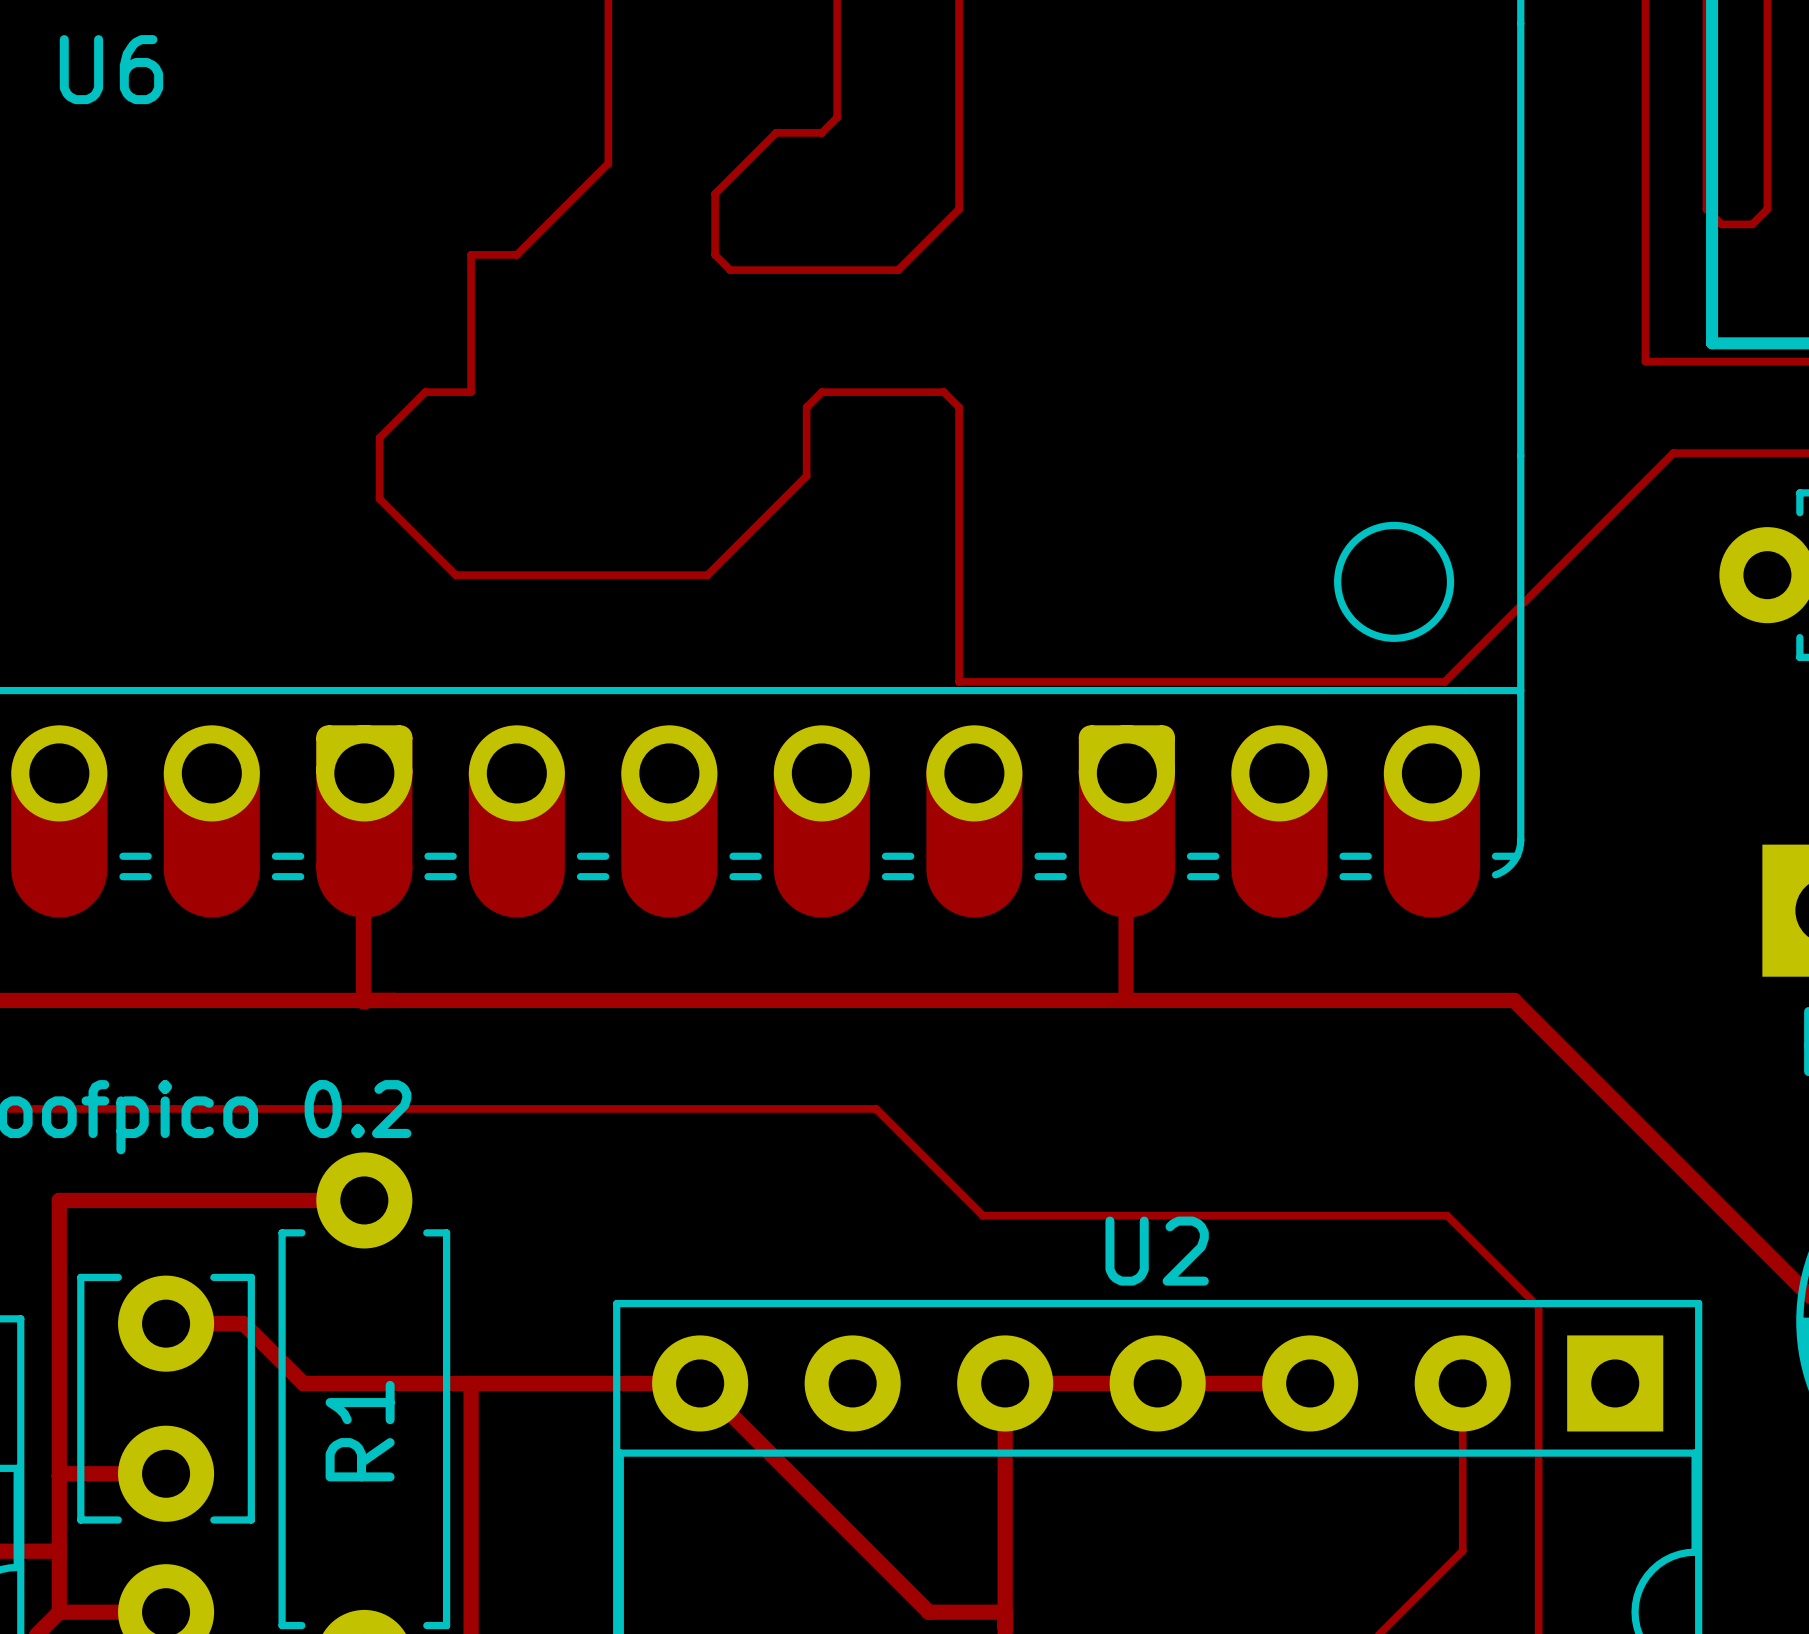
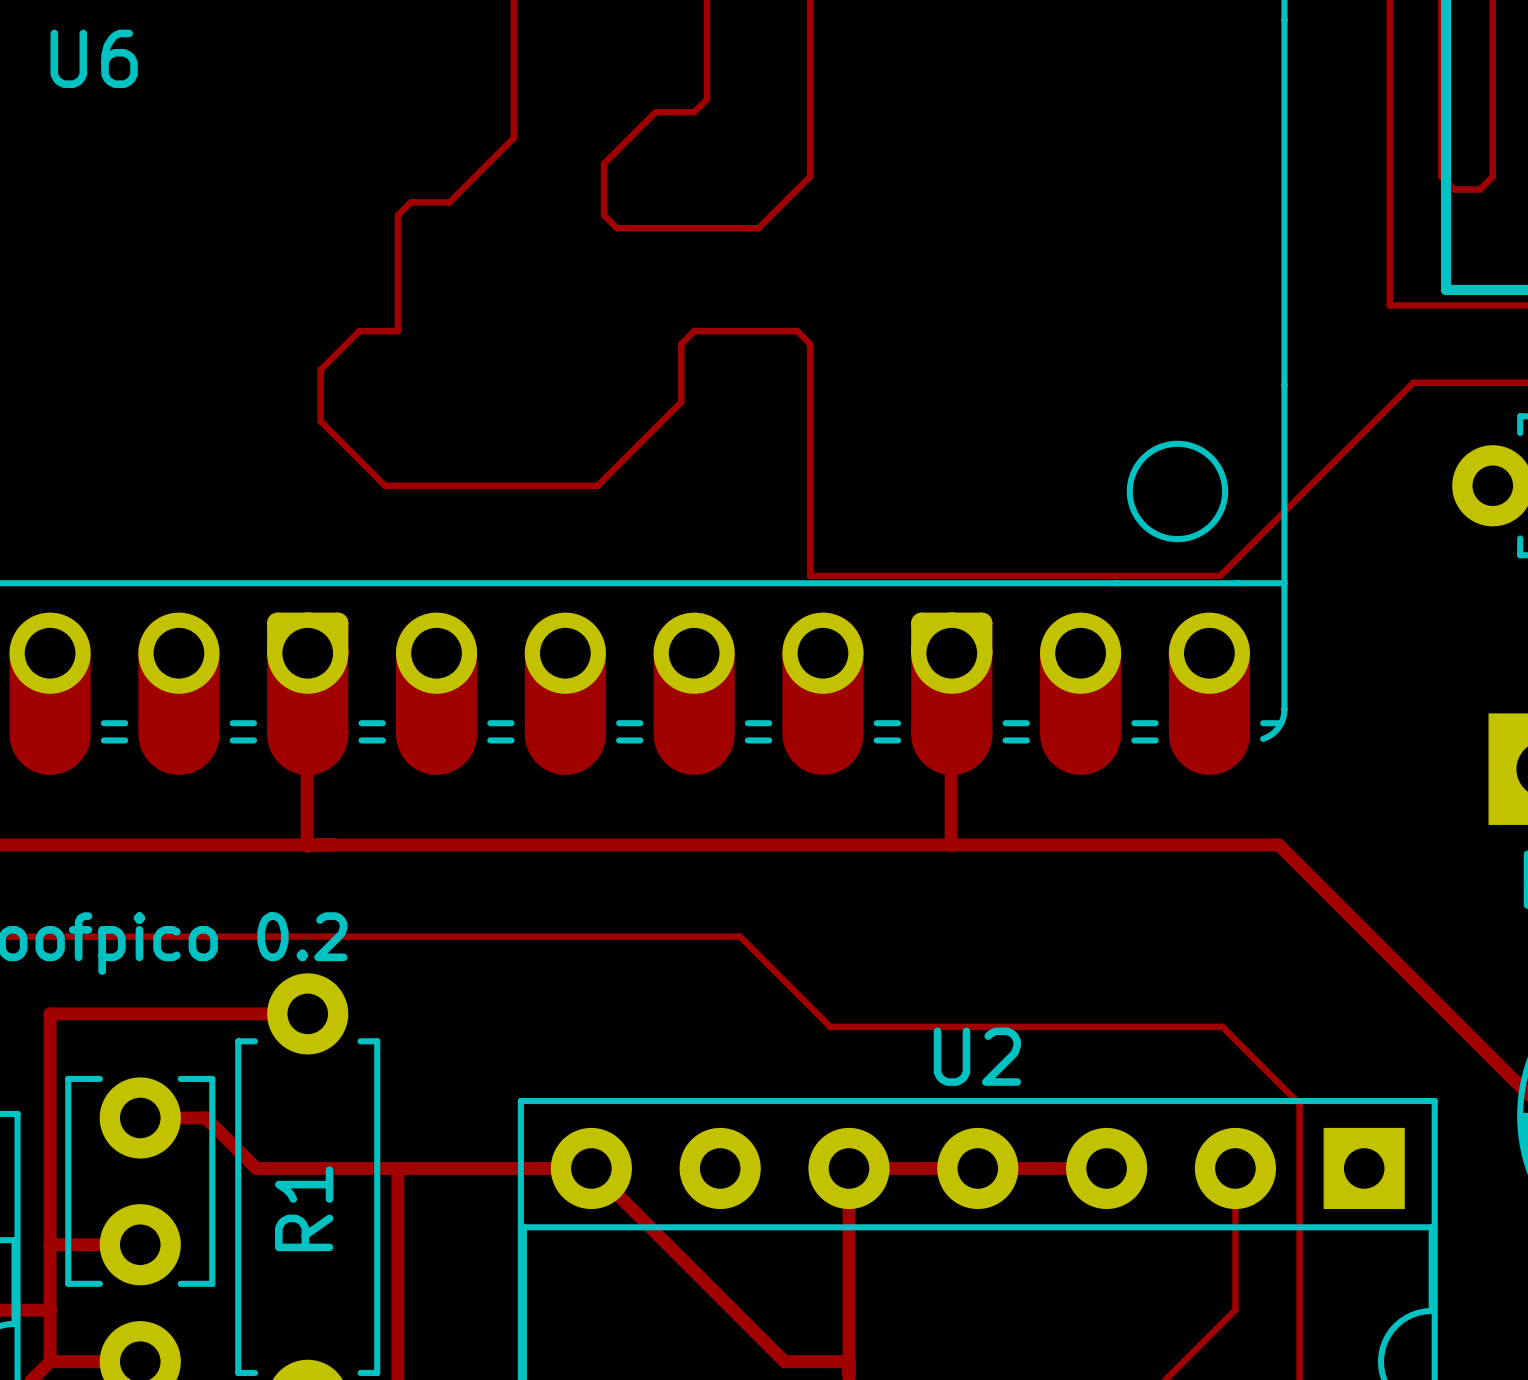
track: (532, 239) (516, 254) (471, 254) -> (449, 202) (410, 202) (397, 215)

